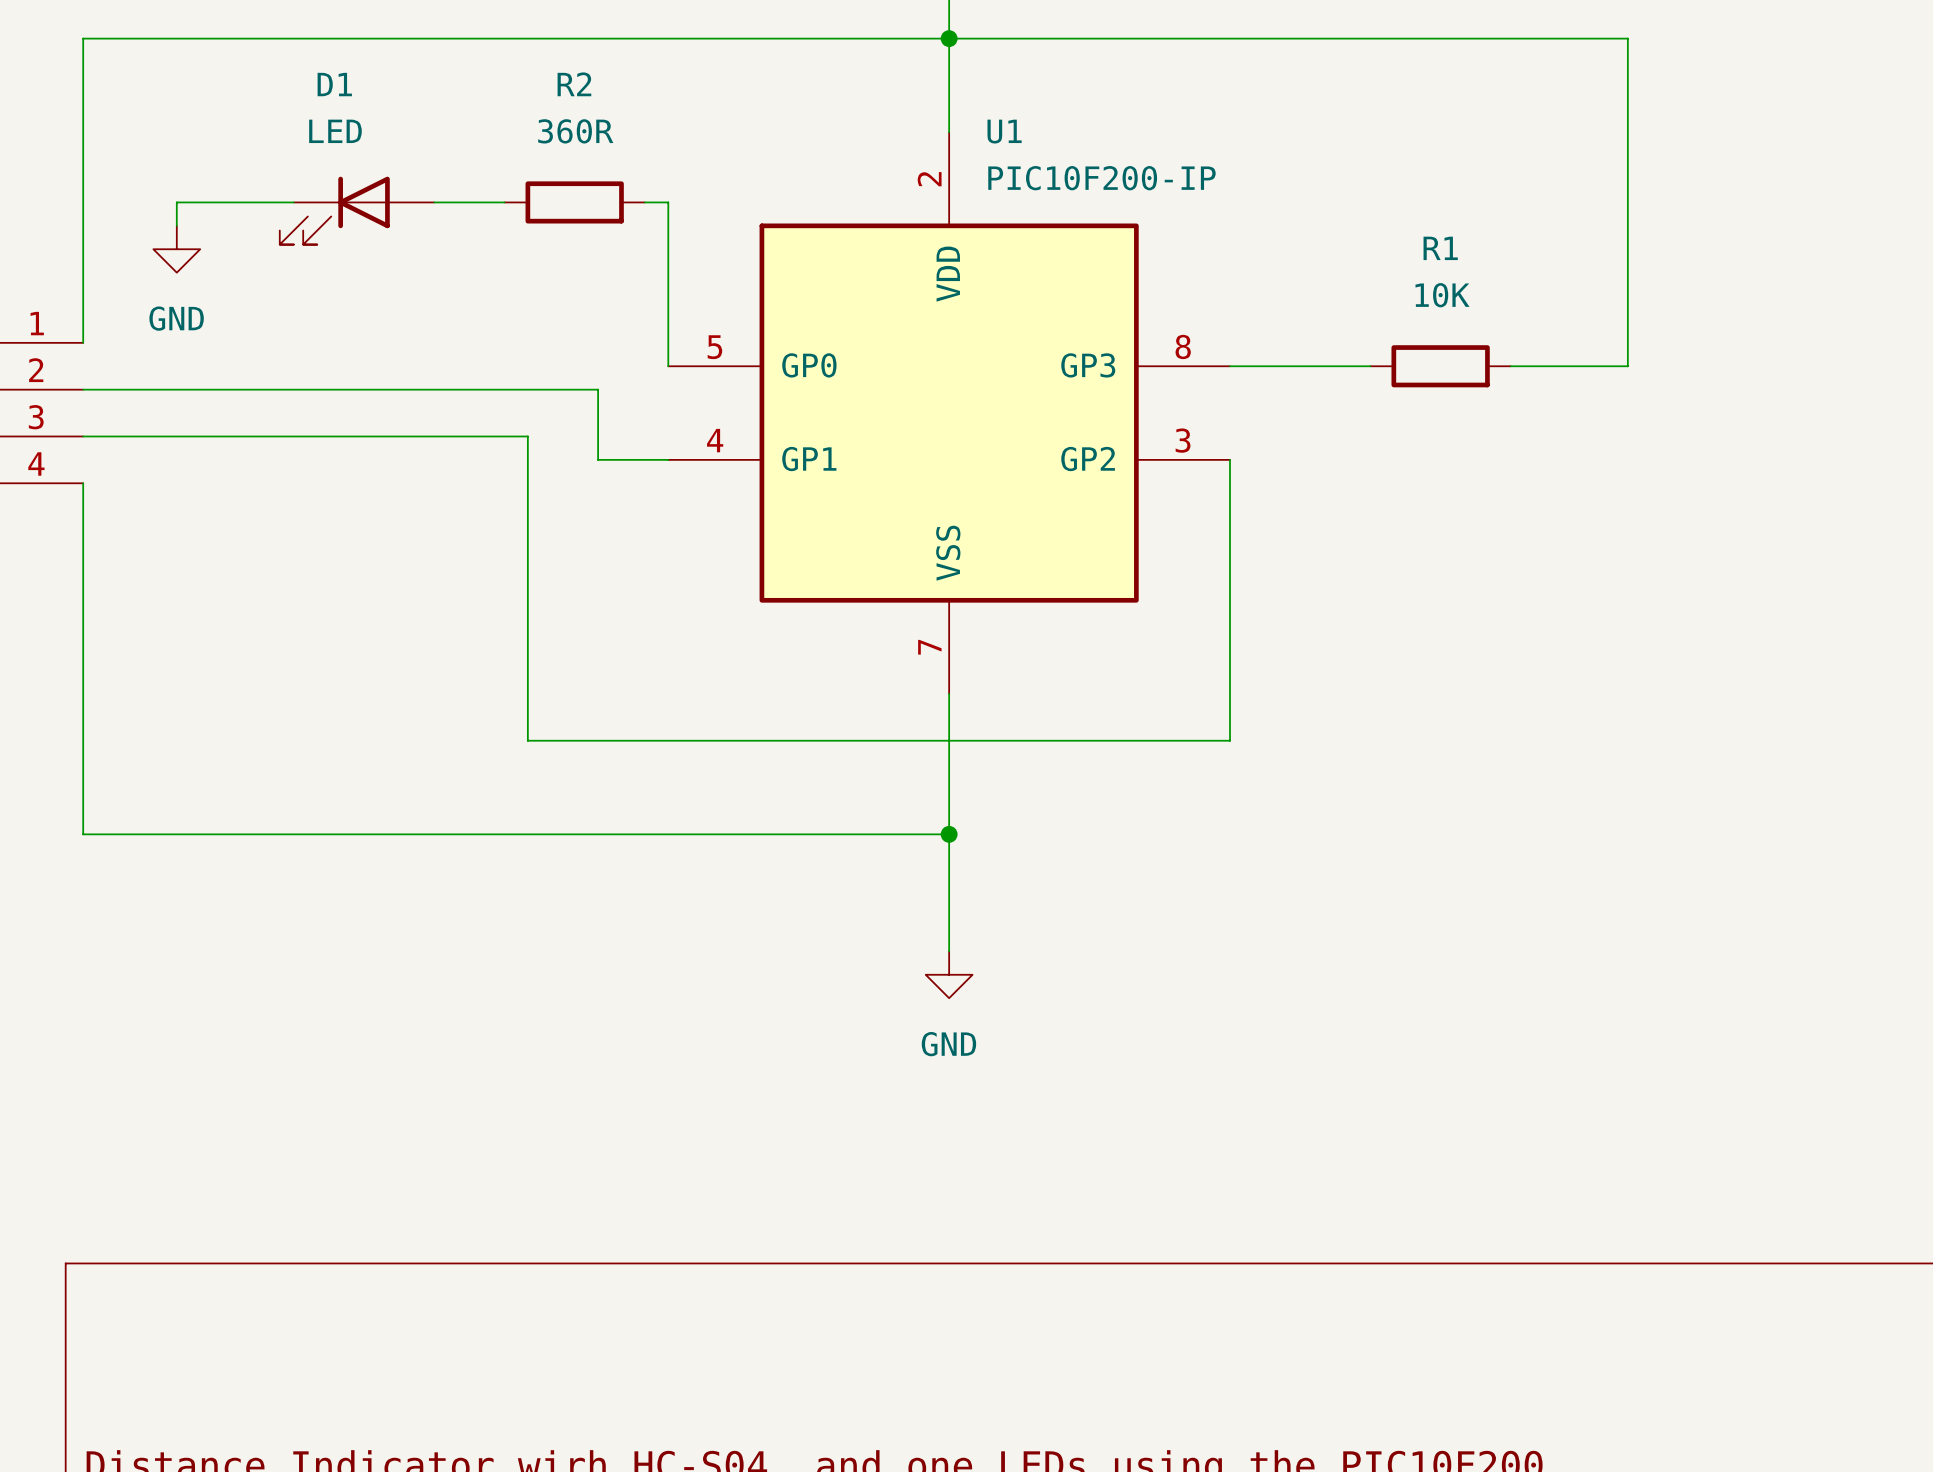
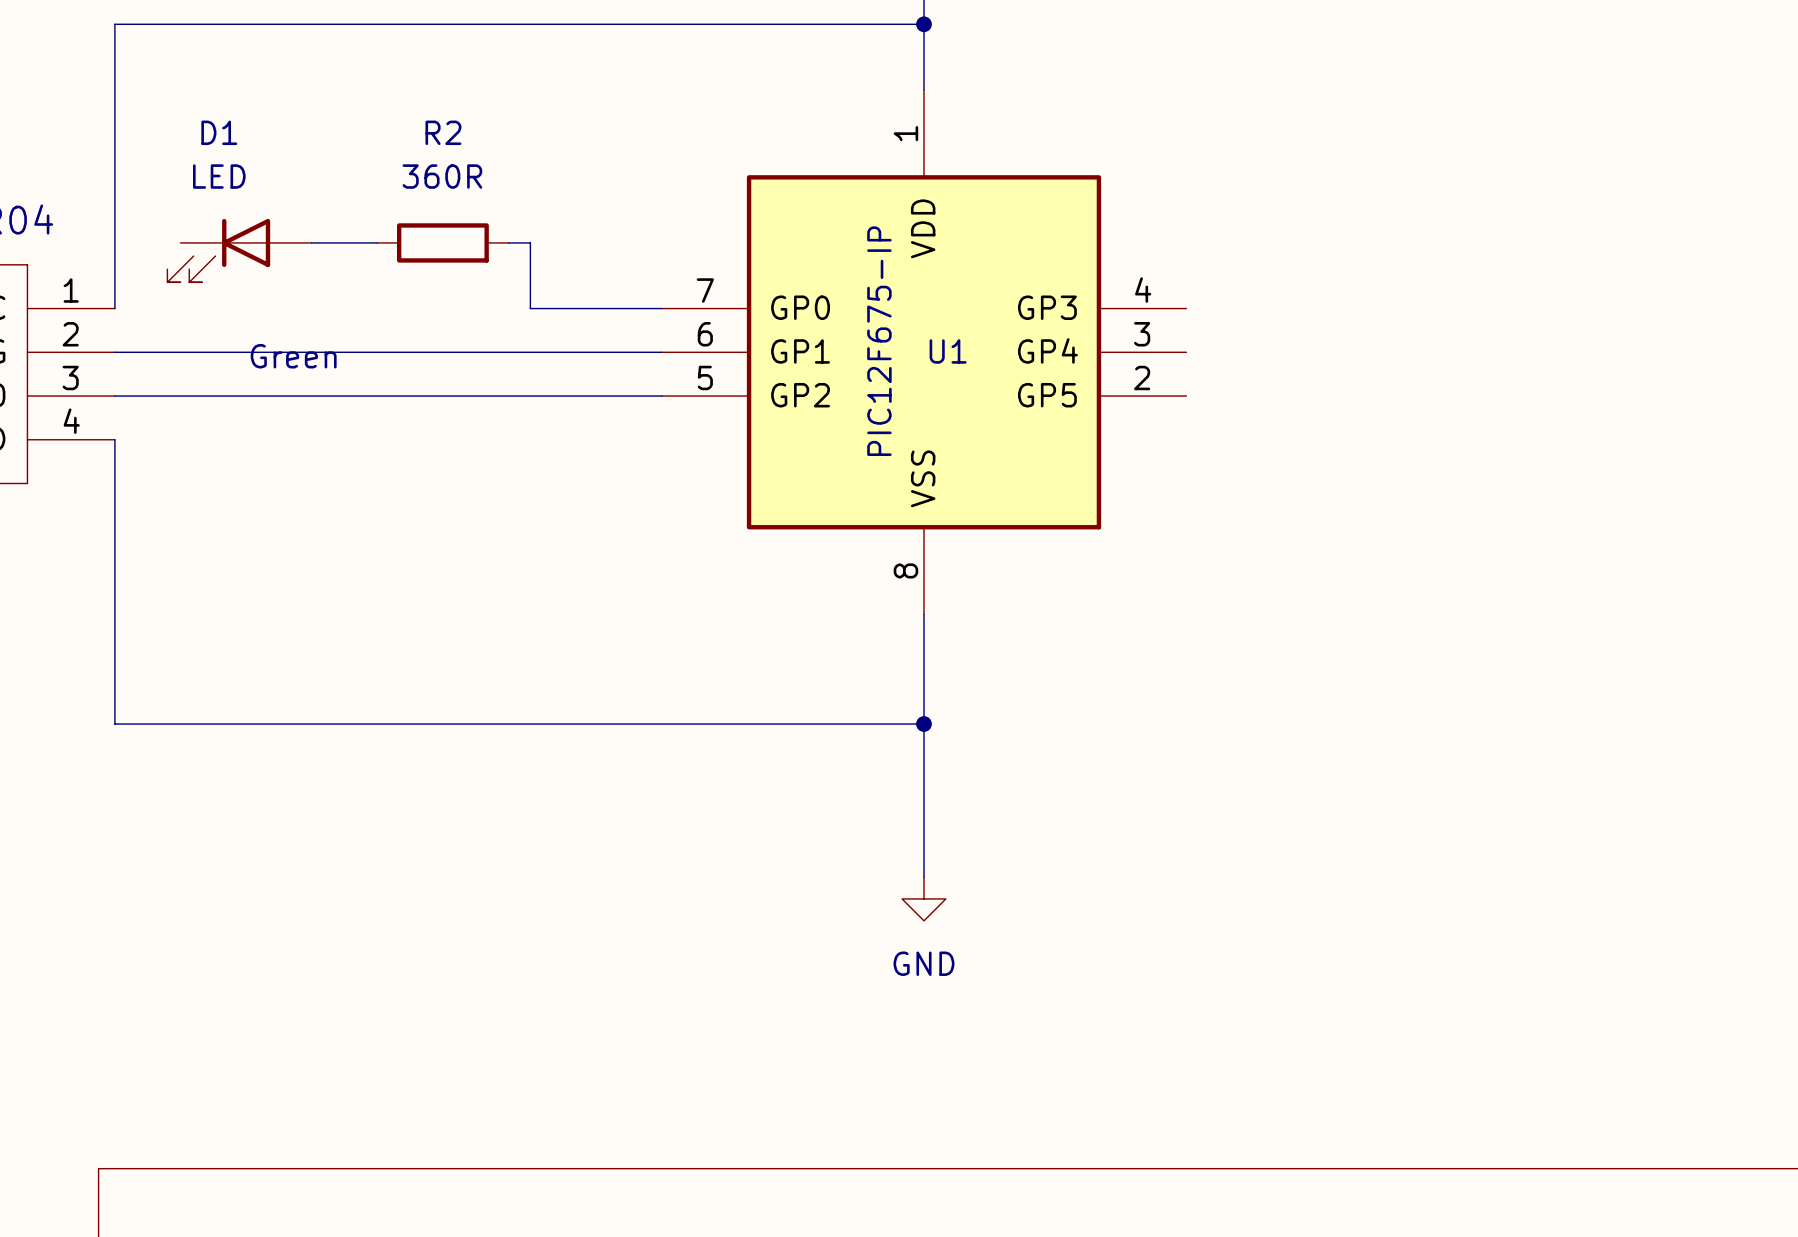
wire: (949, 38) (1627, 38) (1627, 366) (1510, 366) -> none
U1 name position: U1 (1004, 131) -> U1 (948, 351)
U1 symbol: [668, 132, 1230, 694] -> [661, 89, 1187, 615]
U1 value: PIC10F200-IP (1101, 178) -> PIC12F675-IP (879, 341)
wire: (293, 202) (176, 202) (176, 225) -> none
wire: (434, 202) (504, 202) -> (311, 242) (377, 242)
R2 position: (574, 202) -> (442, 242)
wire: (644, 202) (668, 202) (668, 366) -> none
D1 position: (357, 210) -> (239, 250)
power symbol: GND (176, 249) -> none
wire: none -> (508, 242) (530, 242) (530, 308) (661, 308)
wire: (1229, 366) (1370, 366) -> none
R1: 10K (1440, 366) -> none
wire: (598, 389) (598, 459) (668, 459) -> (595, 352) (661, 352)
text: none -> Green (293, 356)
wire: (527, 436) (527, 740) (1229, 740) (1229, 459) -> (530, 396) (661, 396)
wire: (83, 787) (83, 834) (949, 834) -> (114, 724) (923, 724)
junction position: (949, 834) -> (923, 724)

